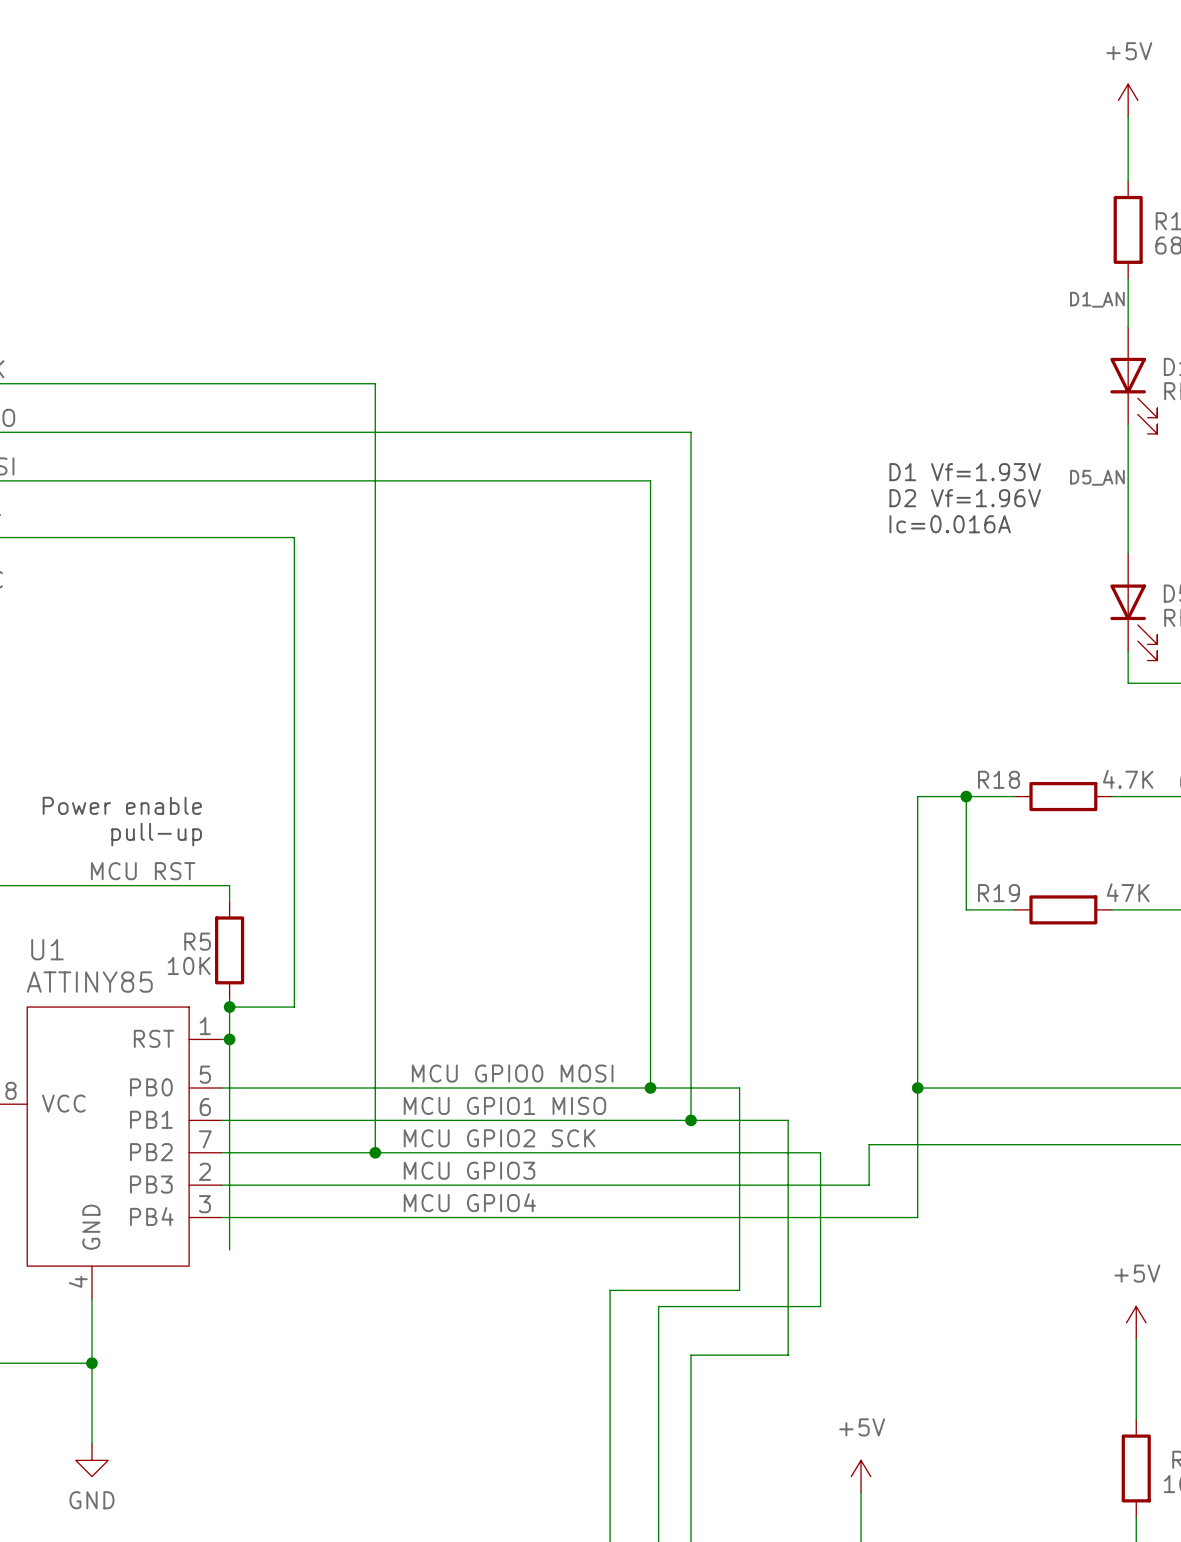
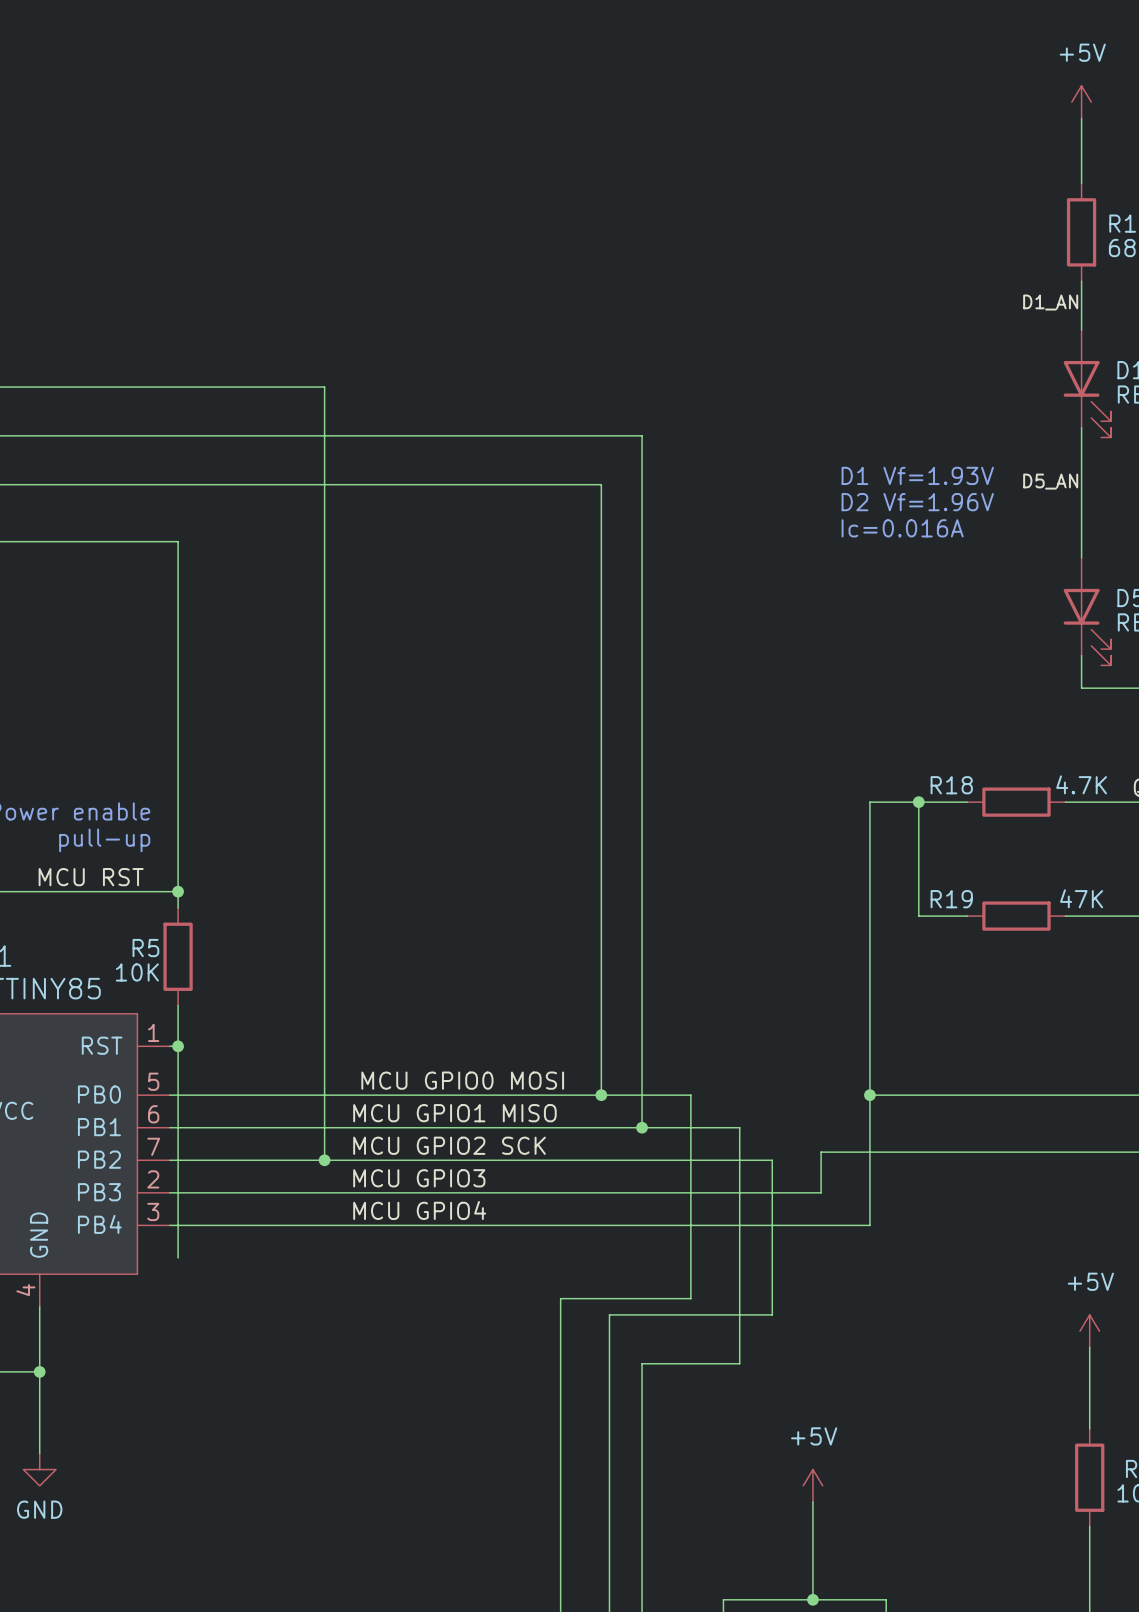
wire: (229, 537) (294, 537) (294, 1007) (229, 1007) -> (178, 541) (178, 891)
junction: none -> (178, 891)
junction: (229, 1007) -> none

